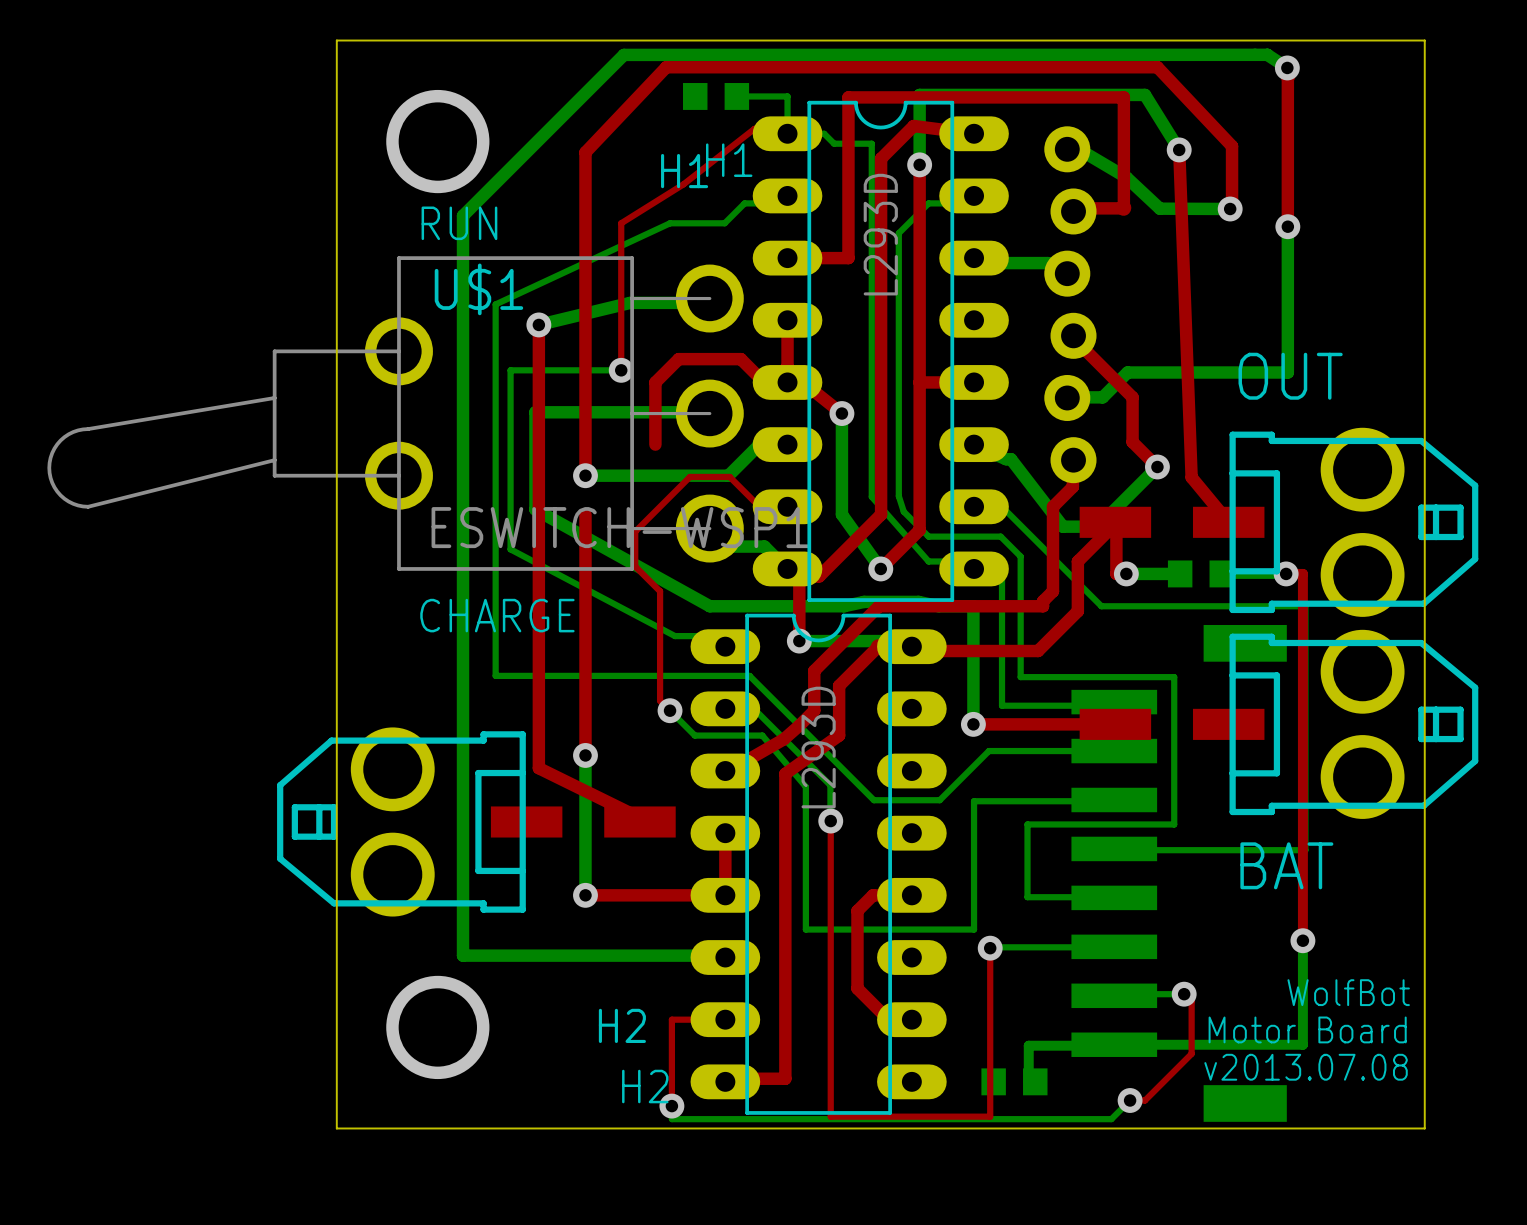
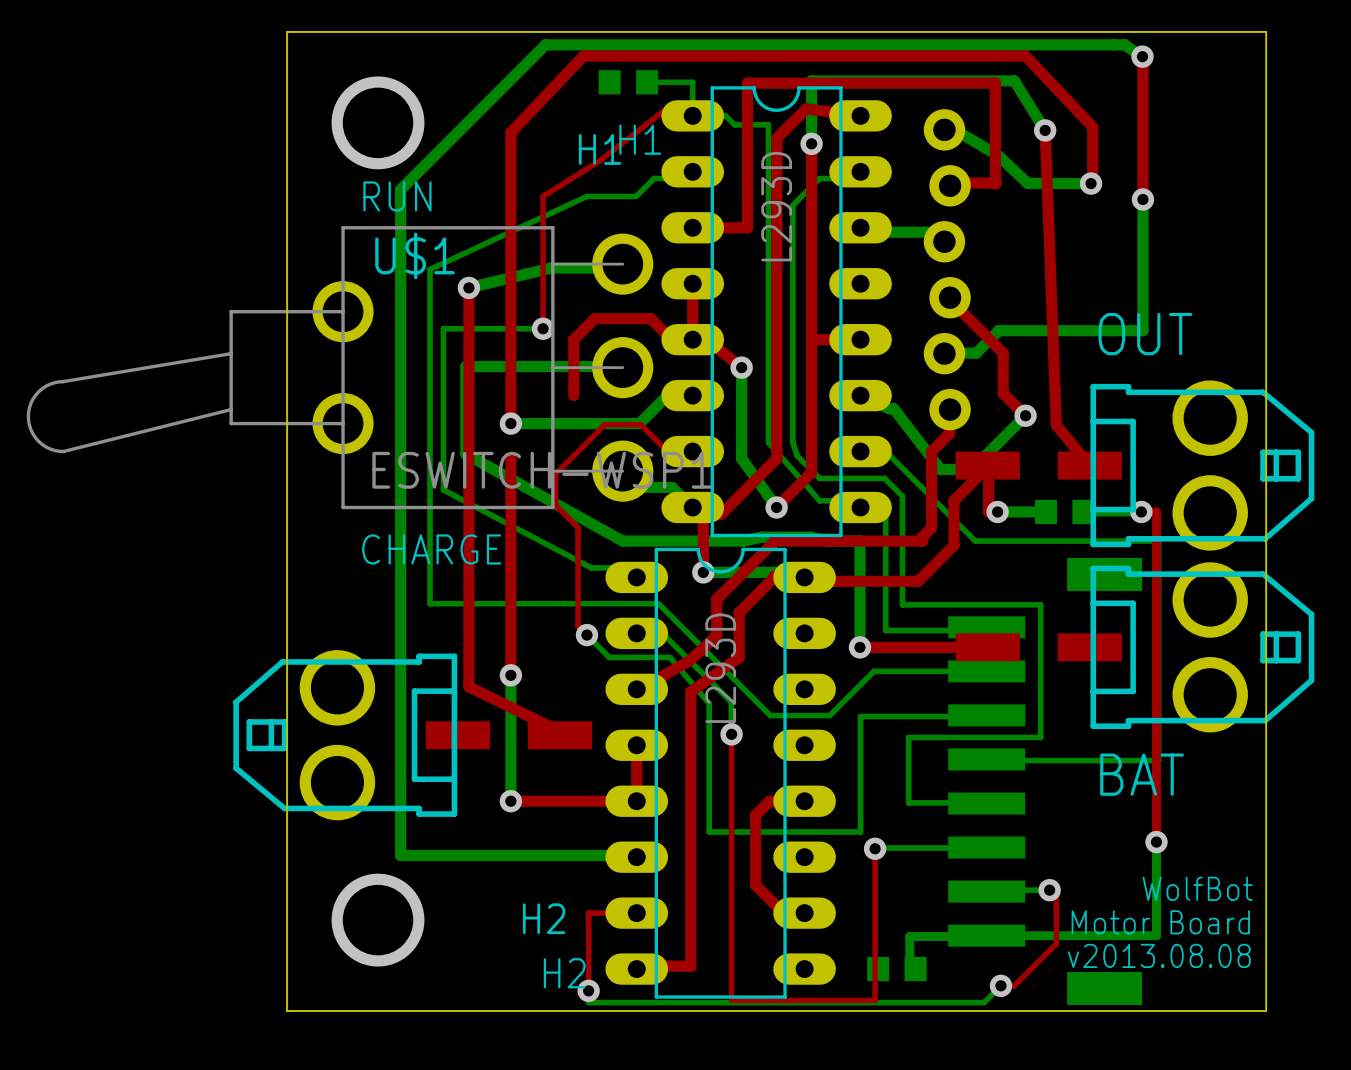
text: v2013.07.08 (1306, 1067) -> v2013.08.08 (1159, 955)

